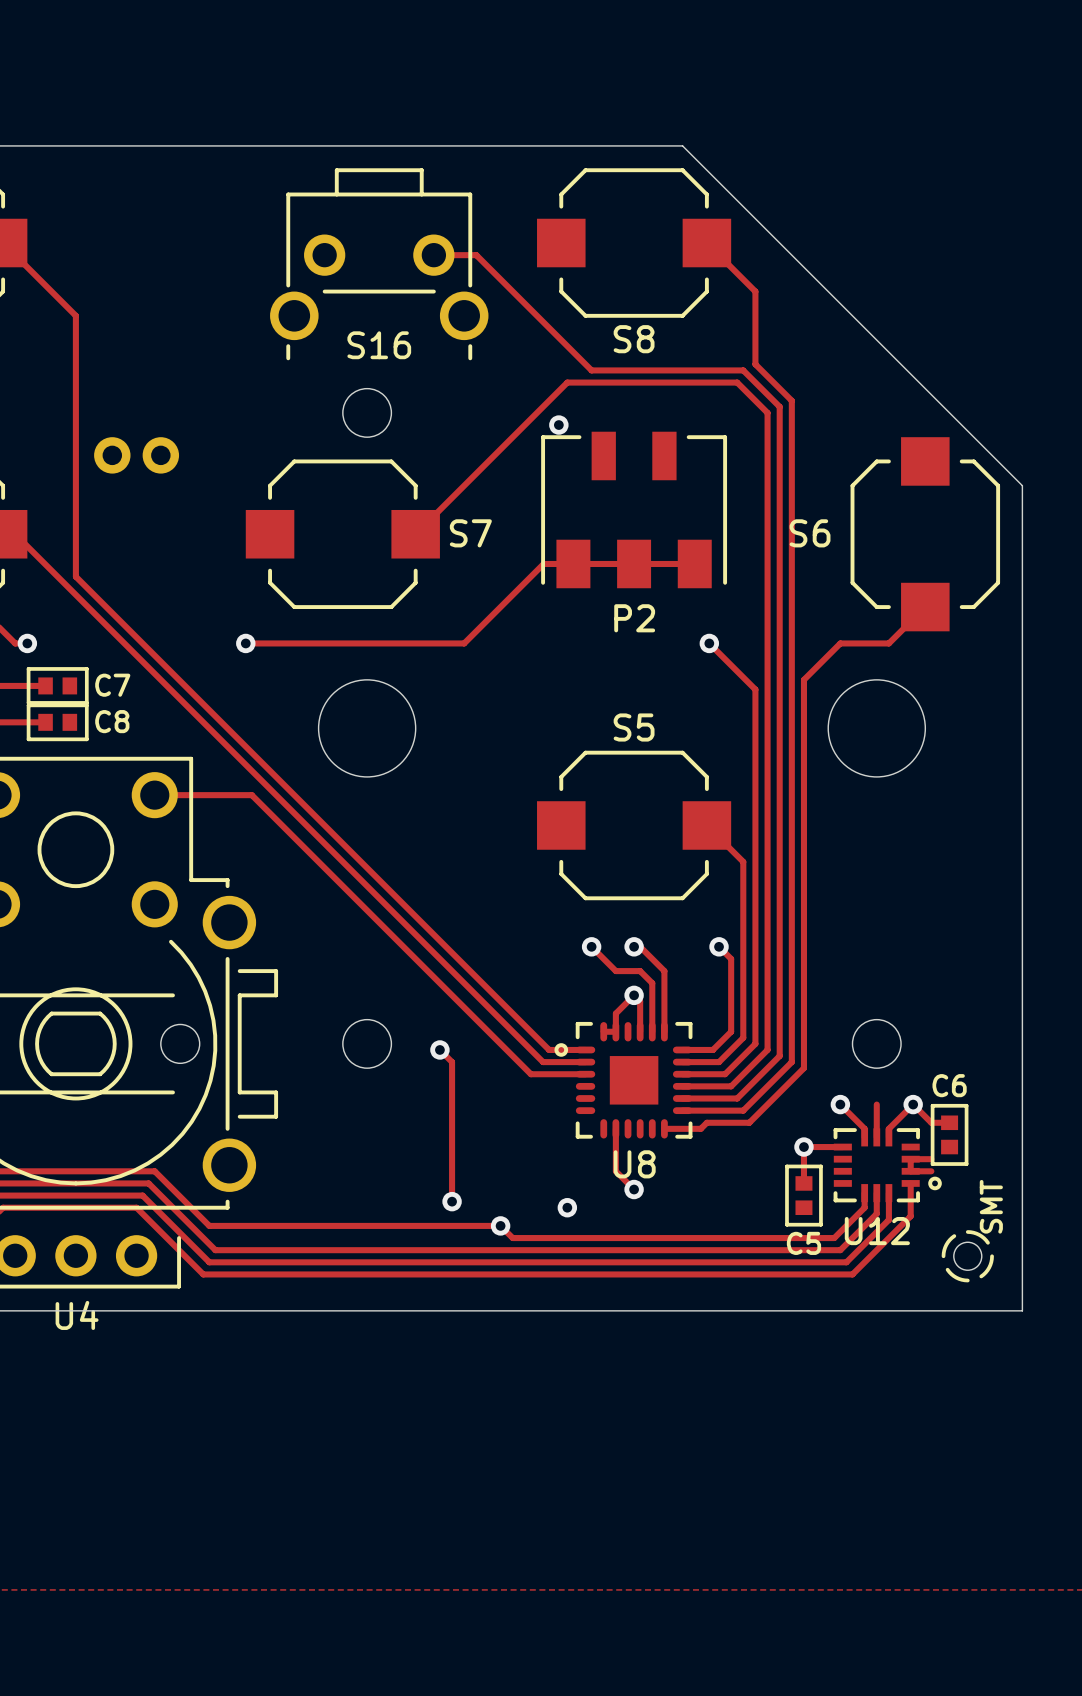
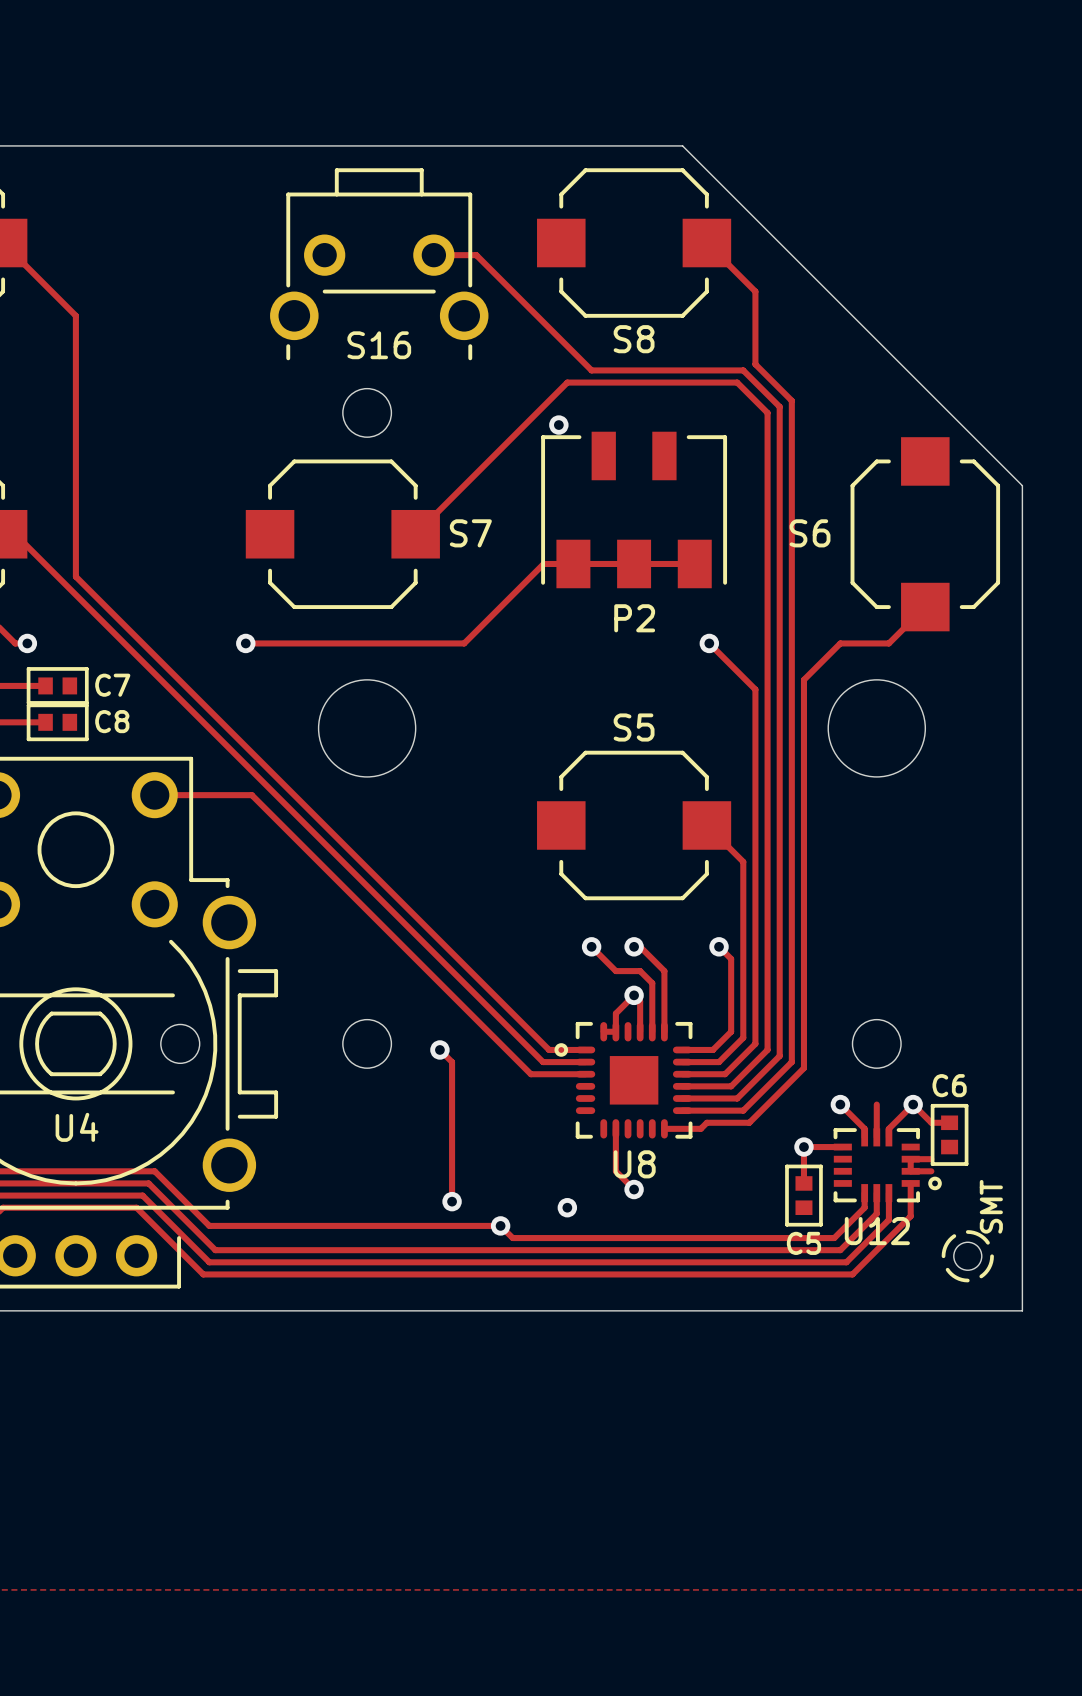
part: (136, 455) -> none
text: none -> U4 (77, 1127)
U4 name: U4 (77, 1315) -> none

